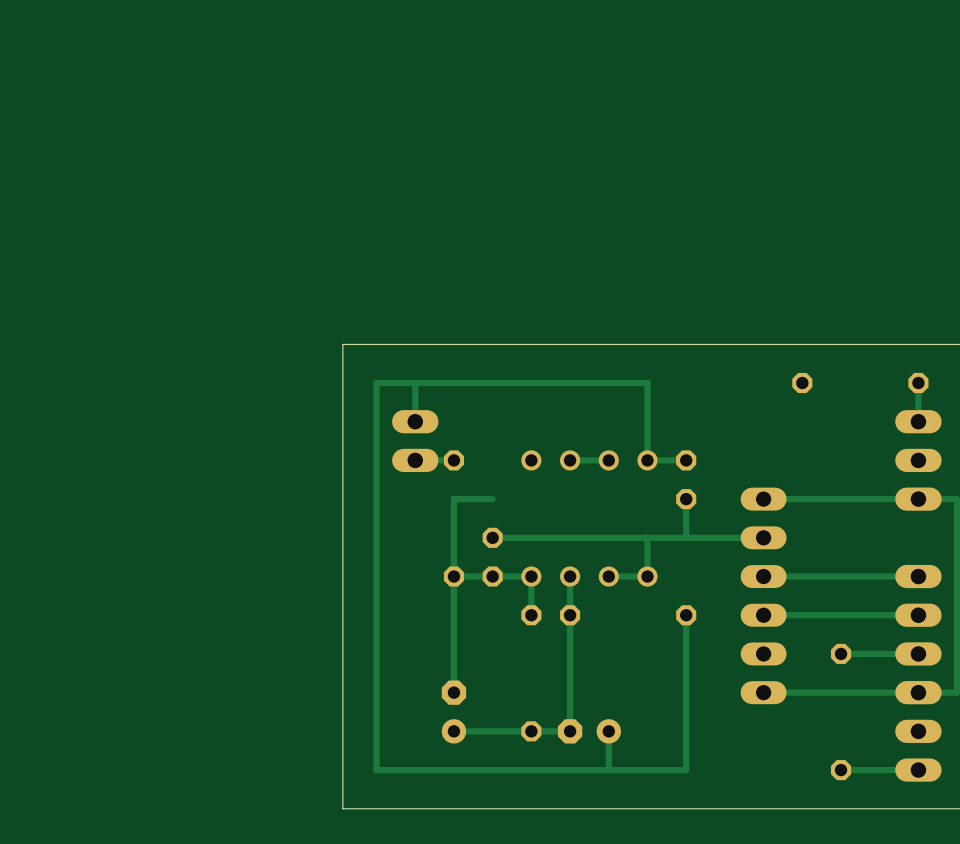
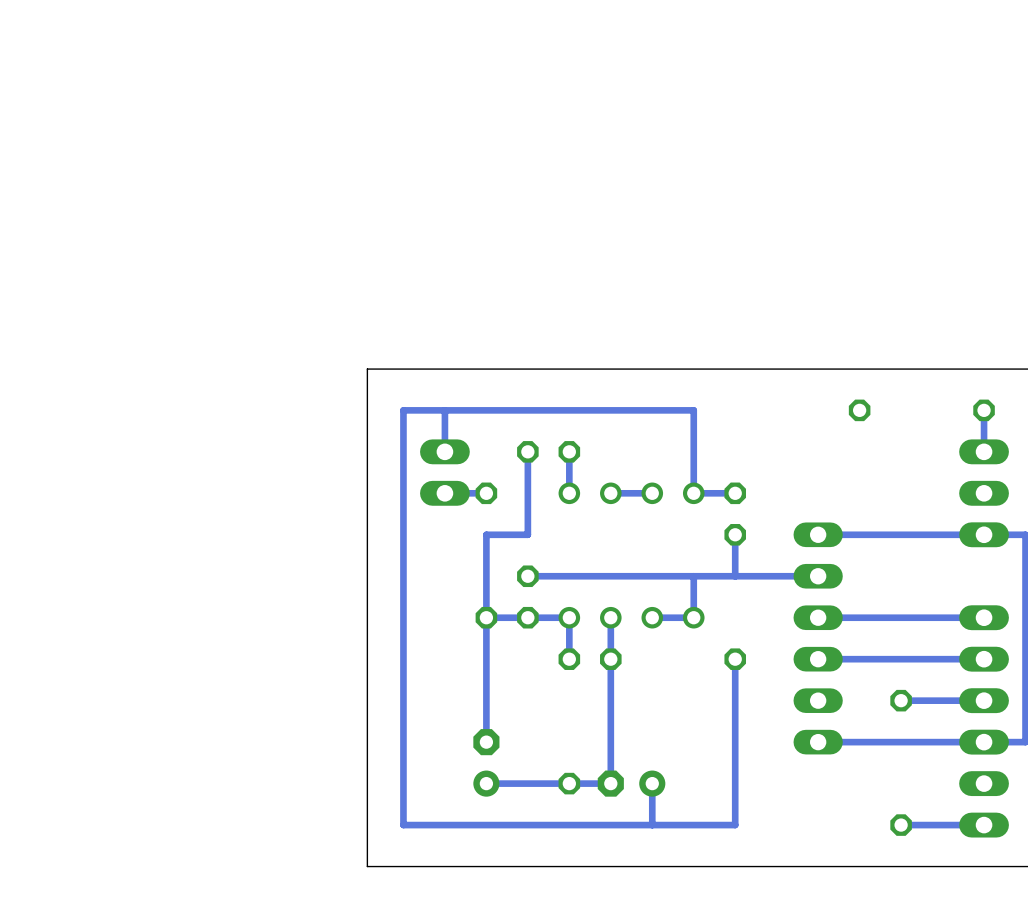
track: none -> (527, 451) (527, 534)
part: none -> (548, 451)
track: none -> (569, 451) (569, 493)

